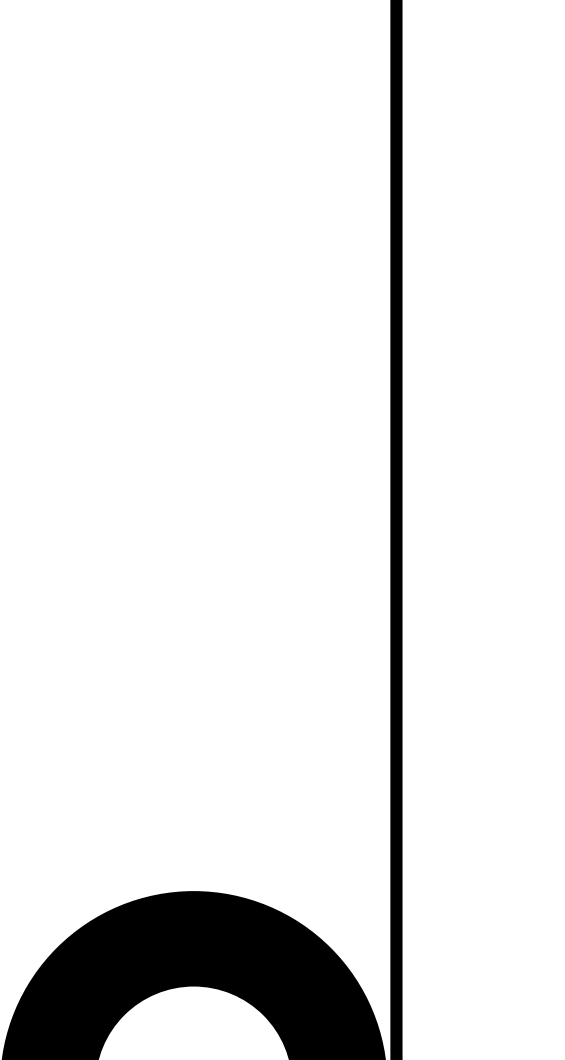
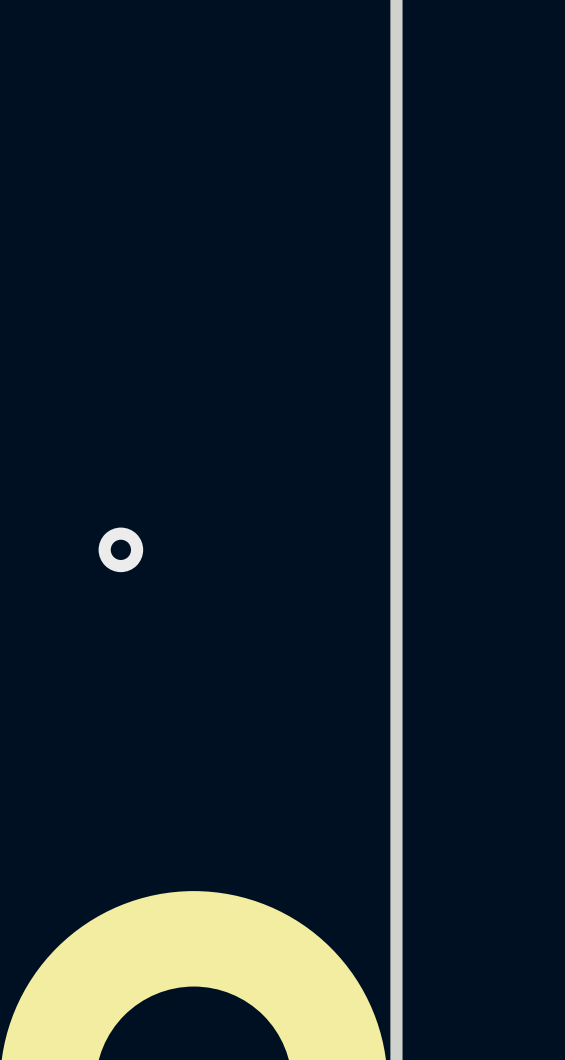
via: none -> (120, 549)

